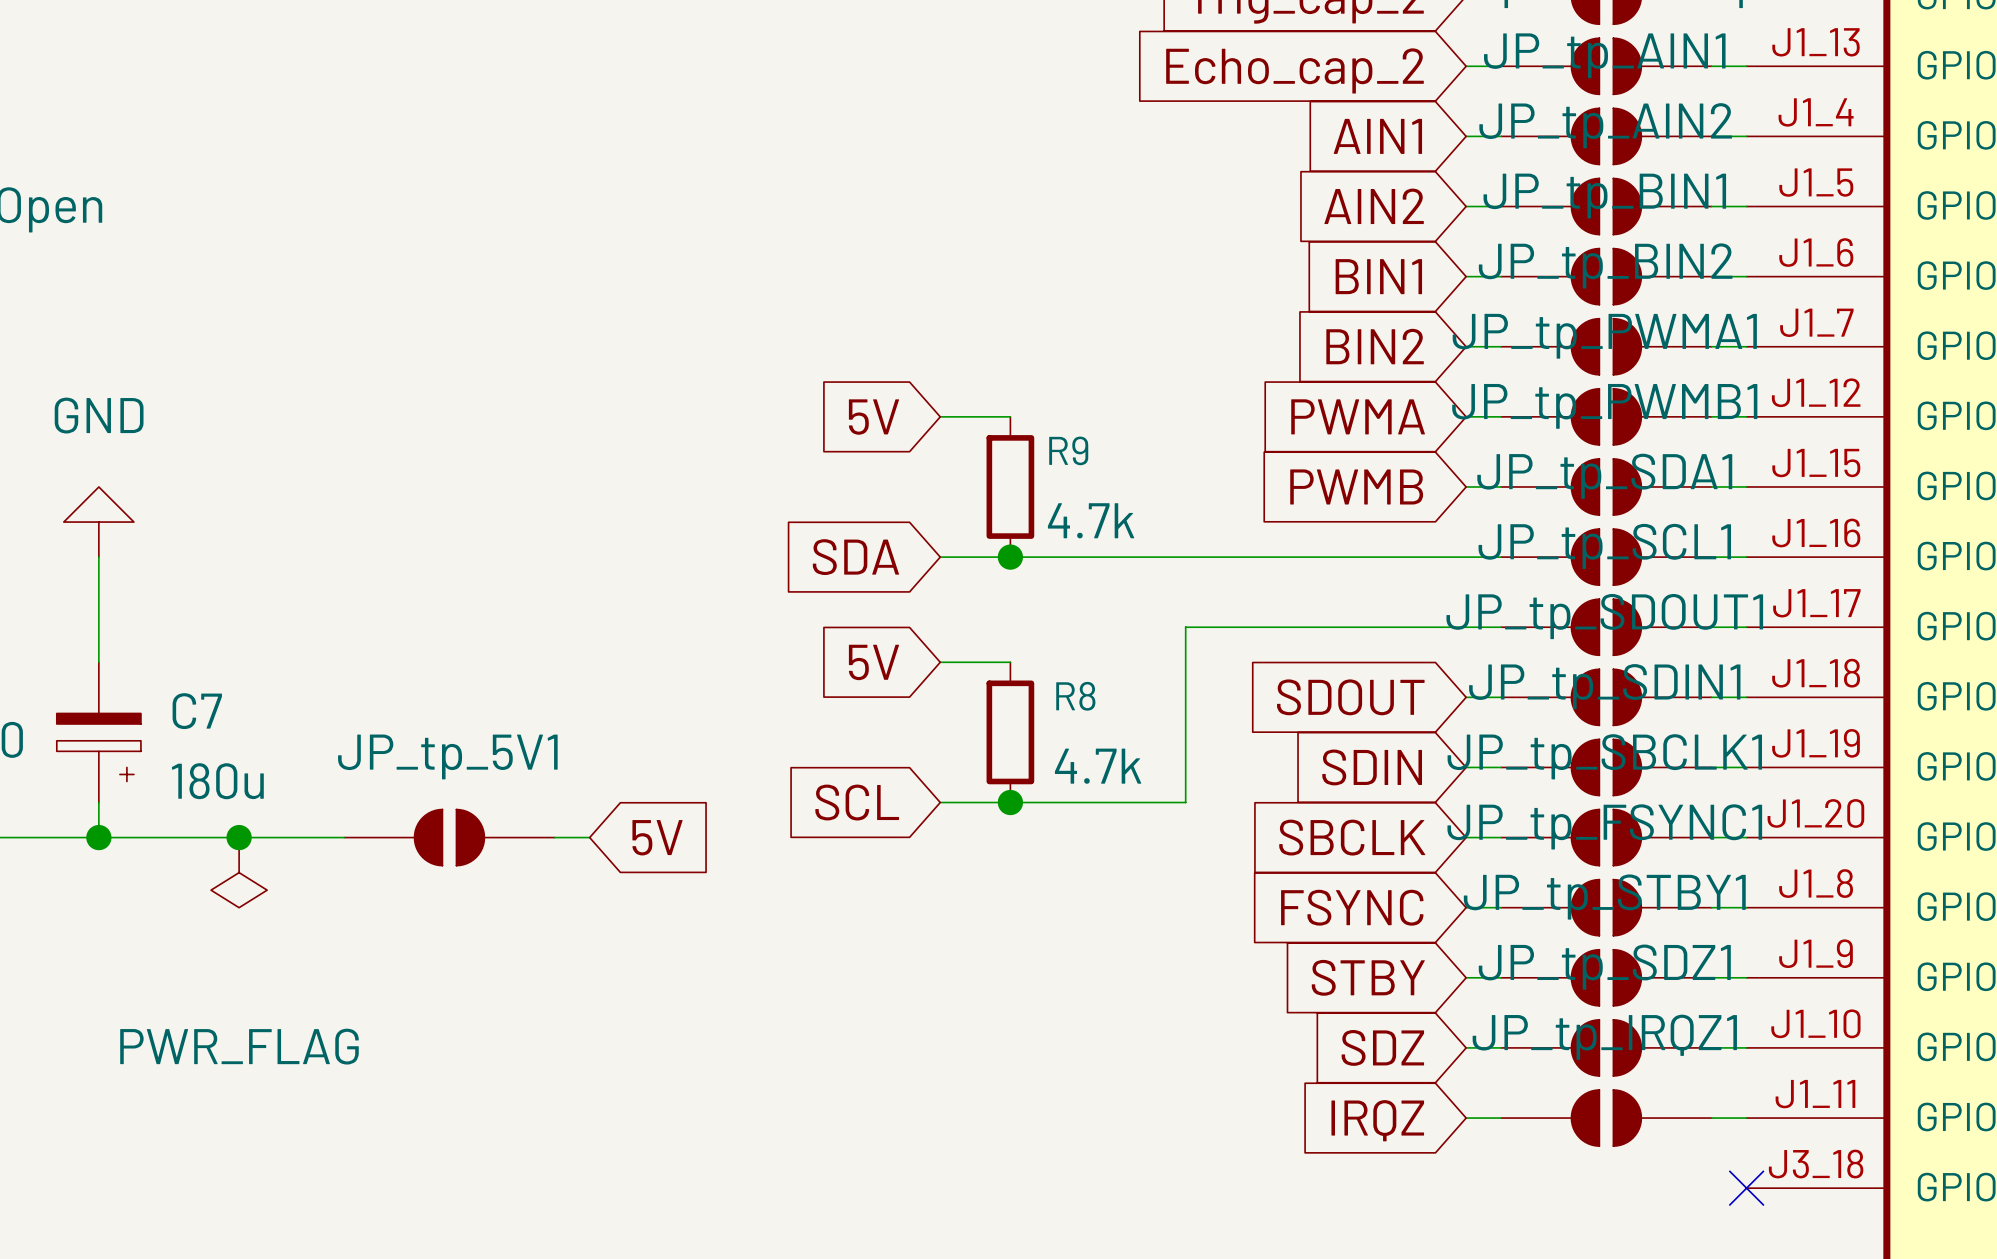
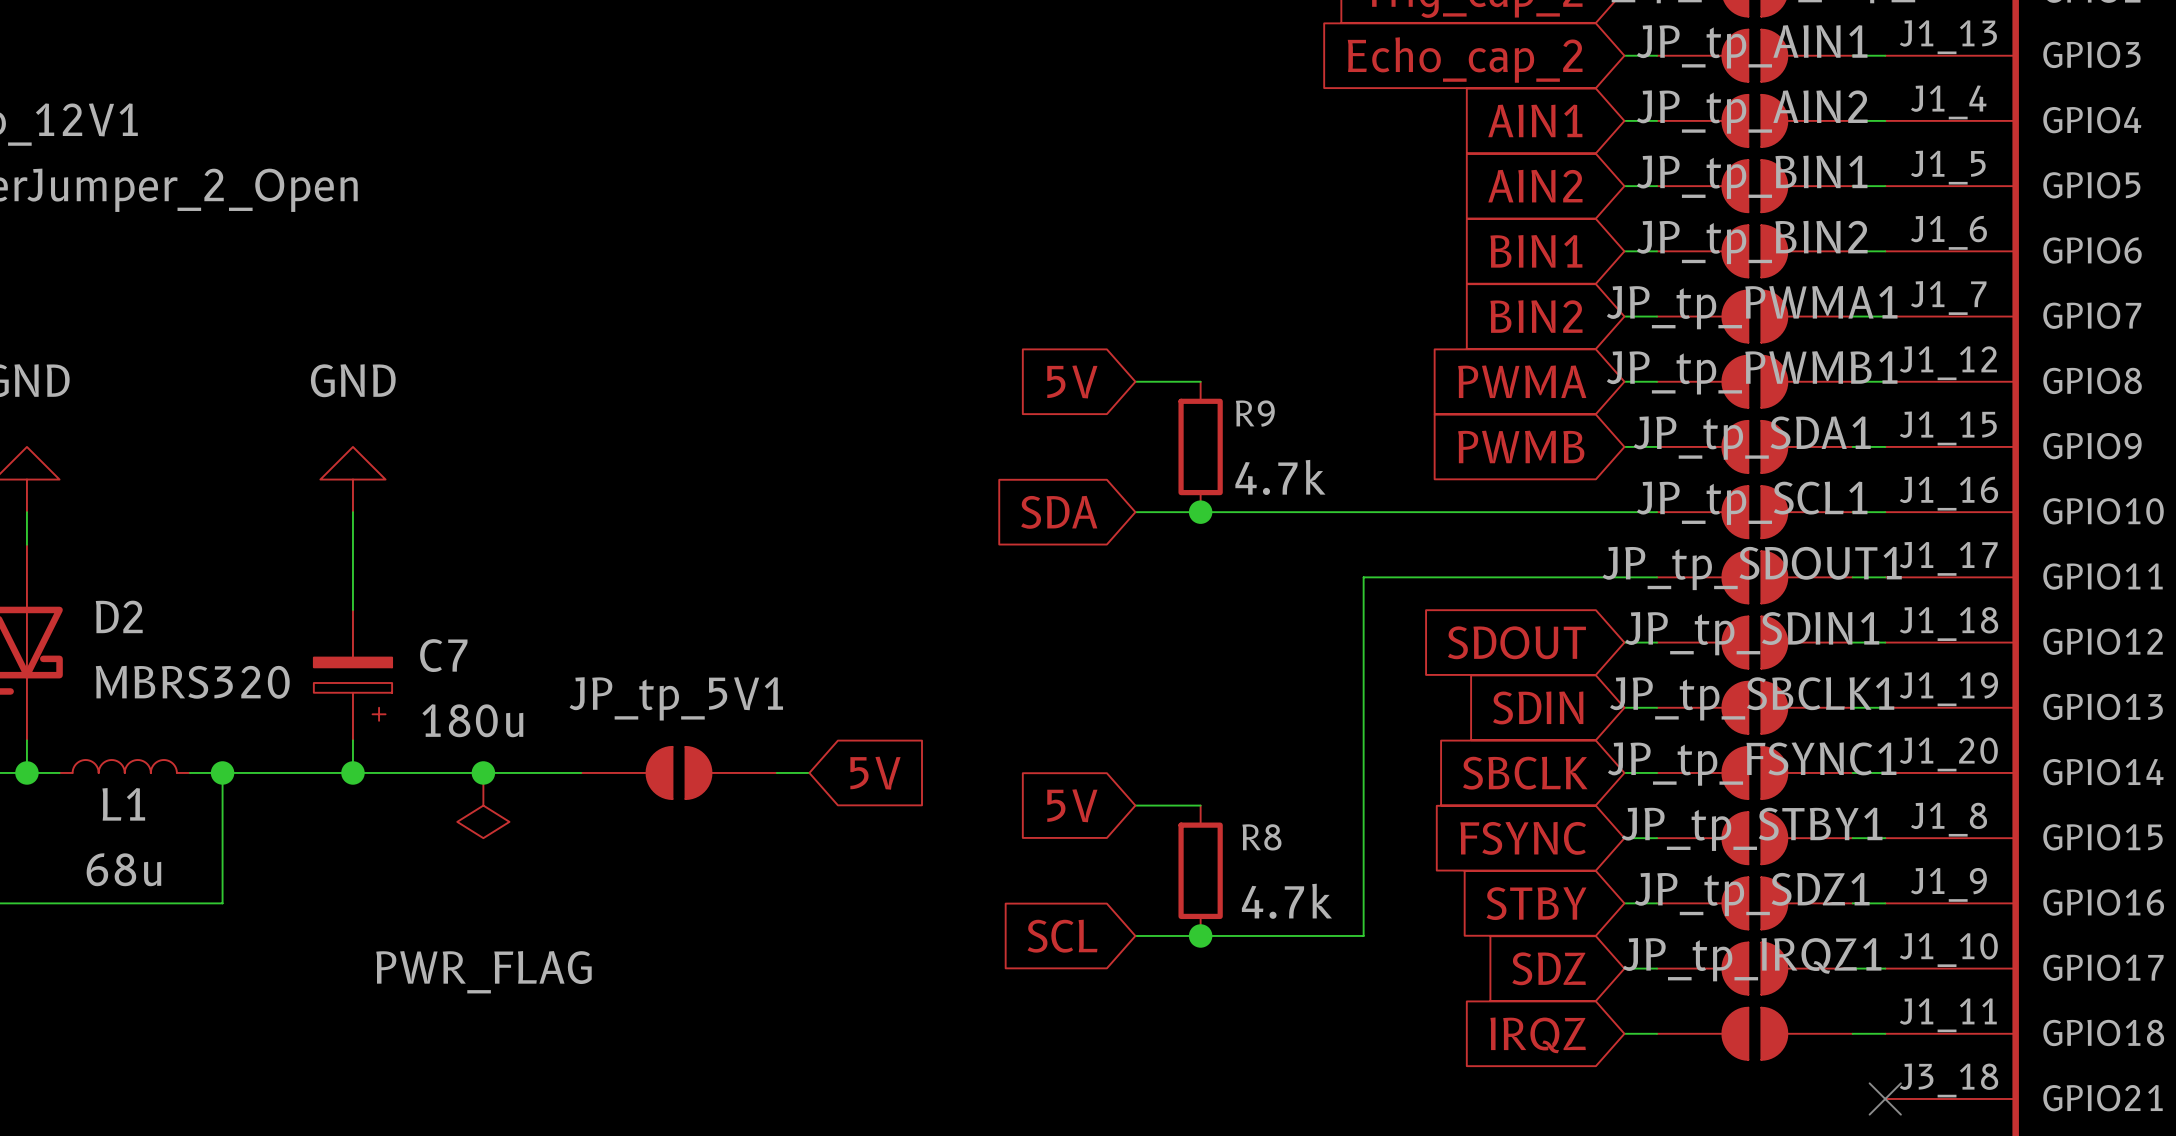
global label position: 5V (874, 662) -> 5V (1072, 805)
wire: (940, 662) (1010, 662) -> (1135, 805) (1200, 805)
R8 position: (1010, 732) -> (1200, 870)
global label position: SCL (857, 802) -> SCL (1062, 936)
wire: (940, 802) (1185, 802) -> (1135, 935) (1363, 935) (1363, 740)
junction: (1010, 802) -> none
junction: none -> (1200, 935)

